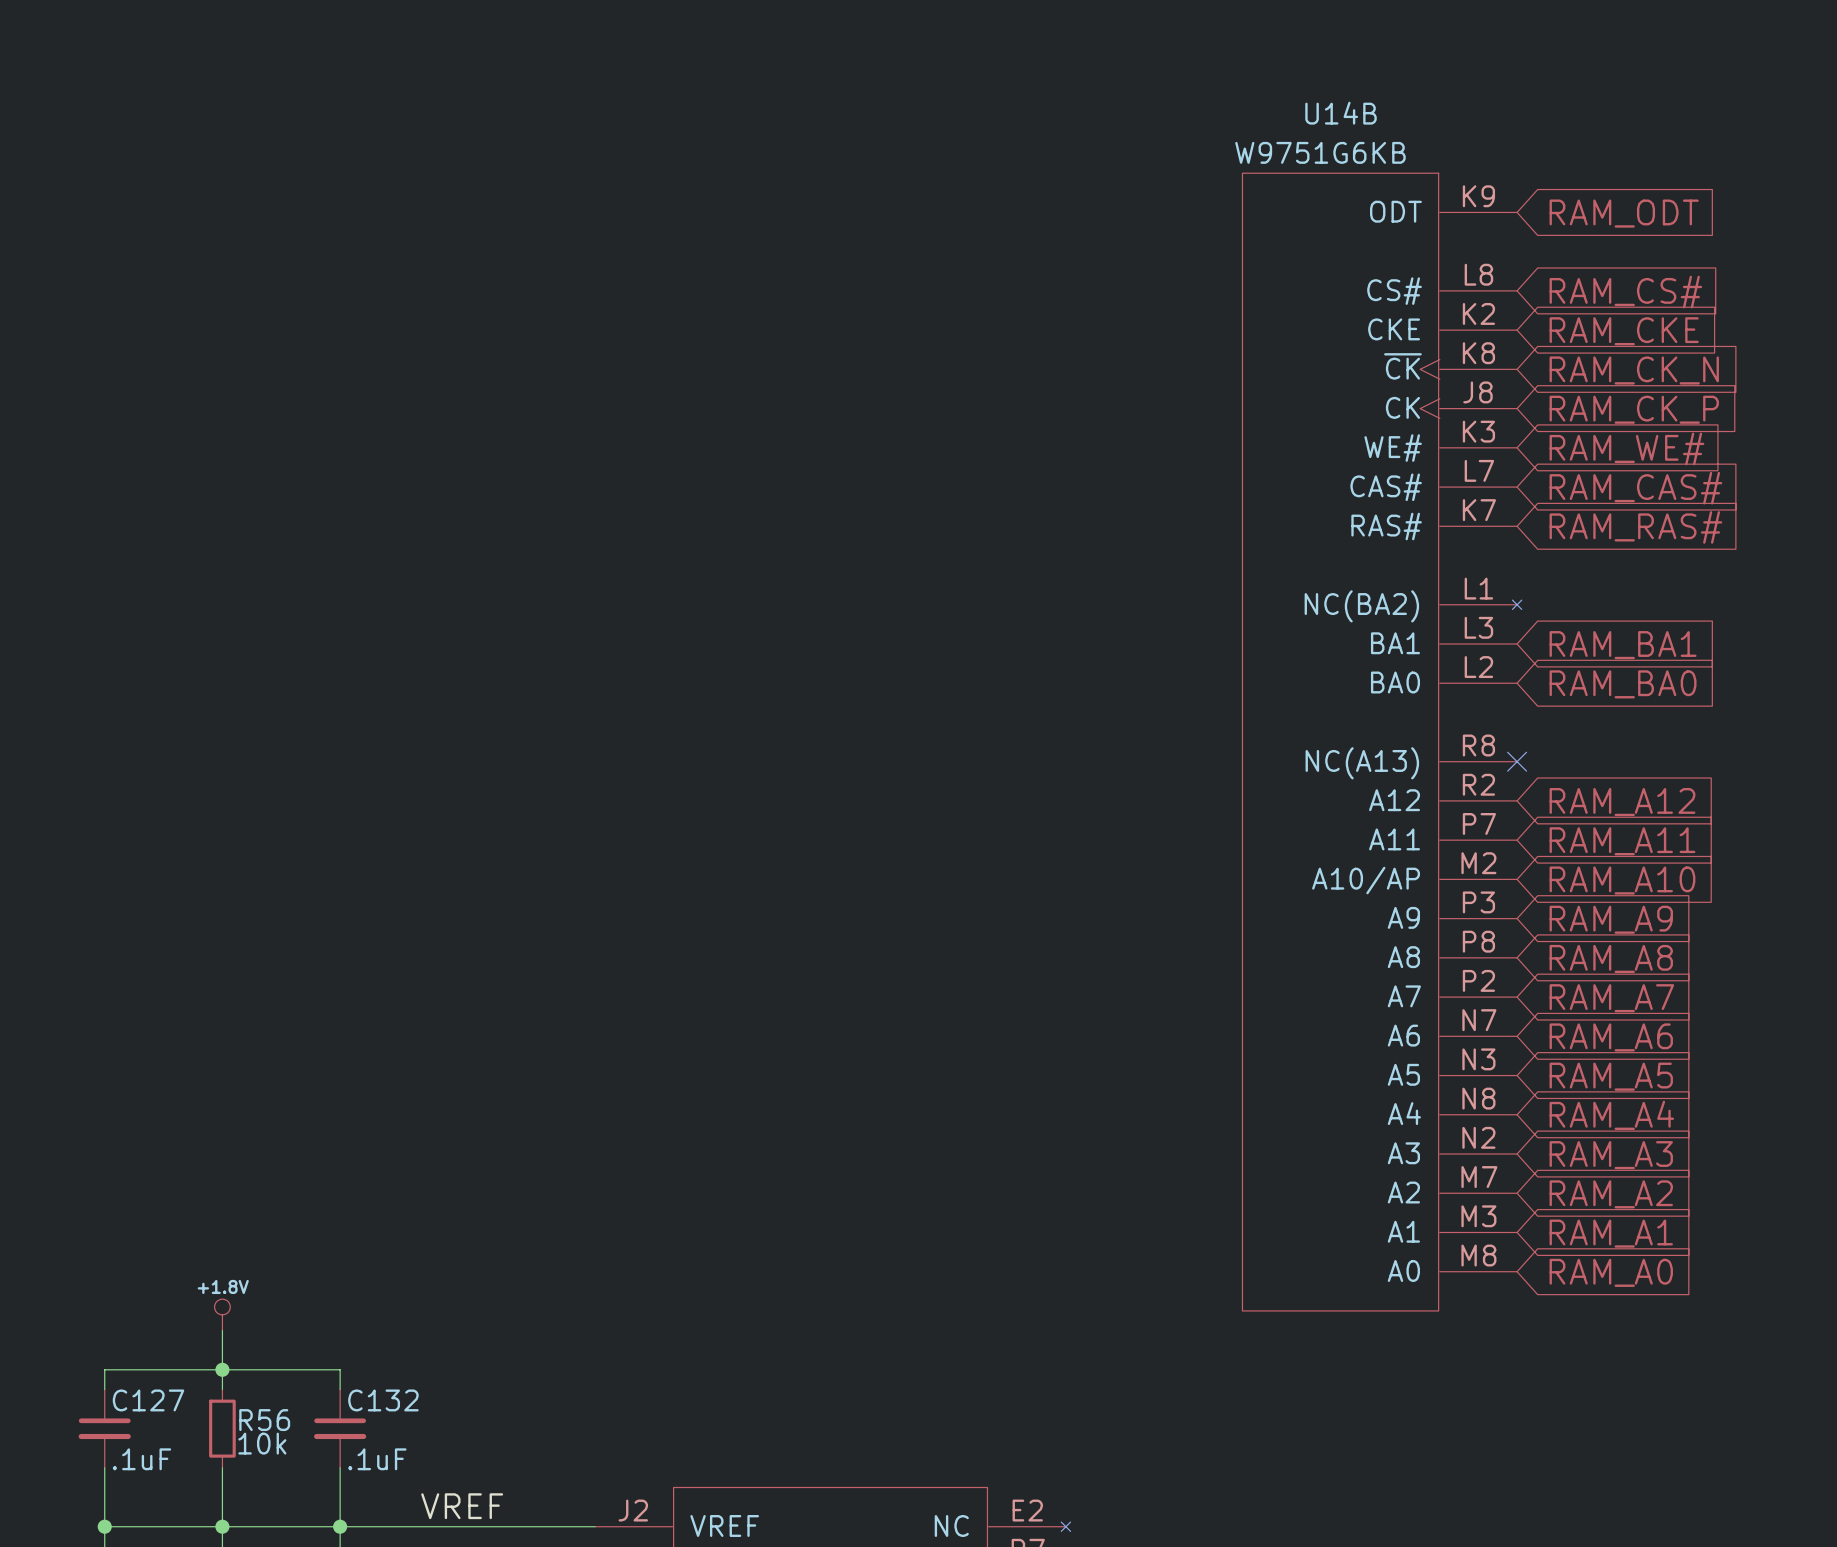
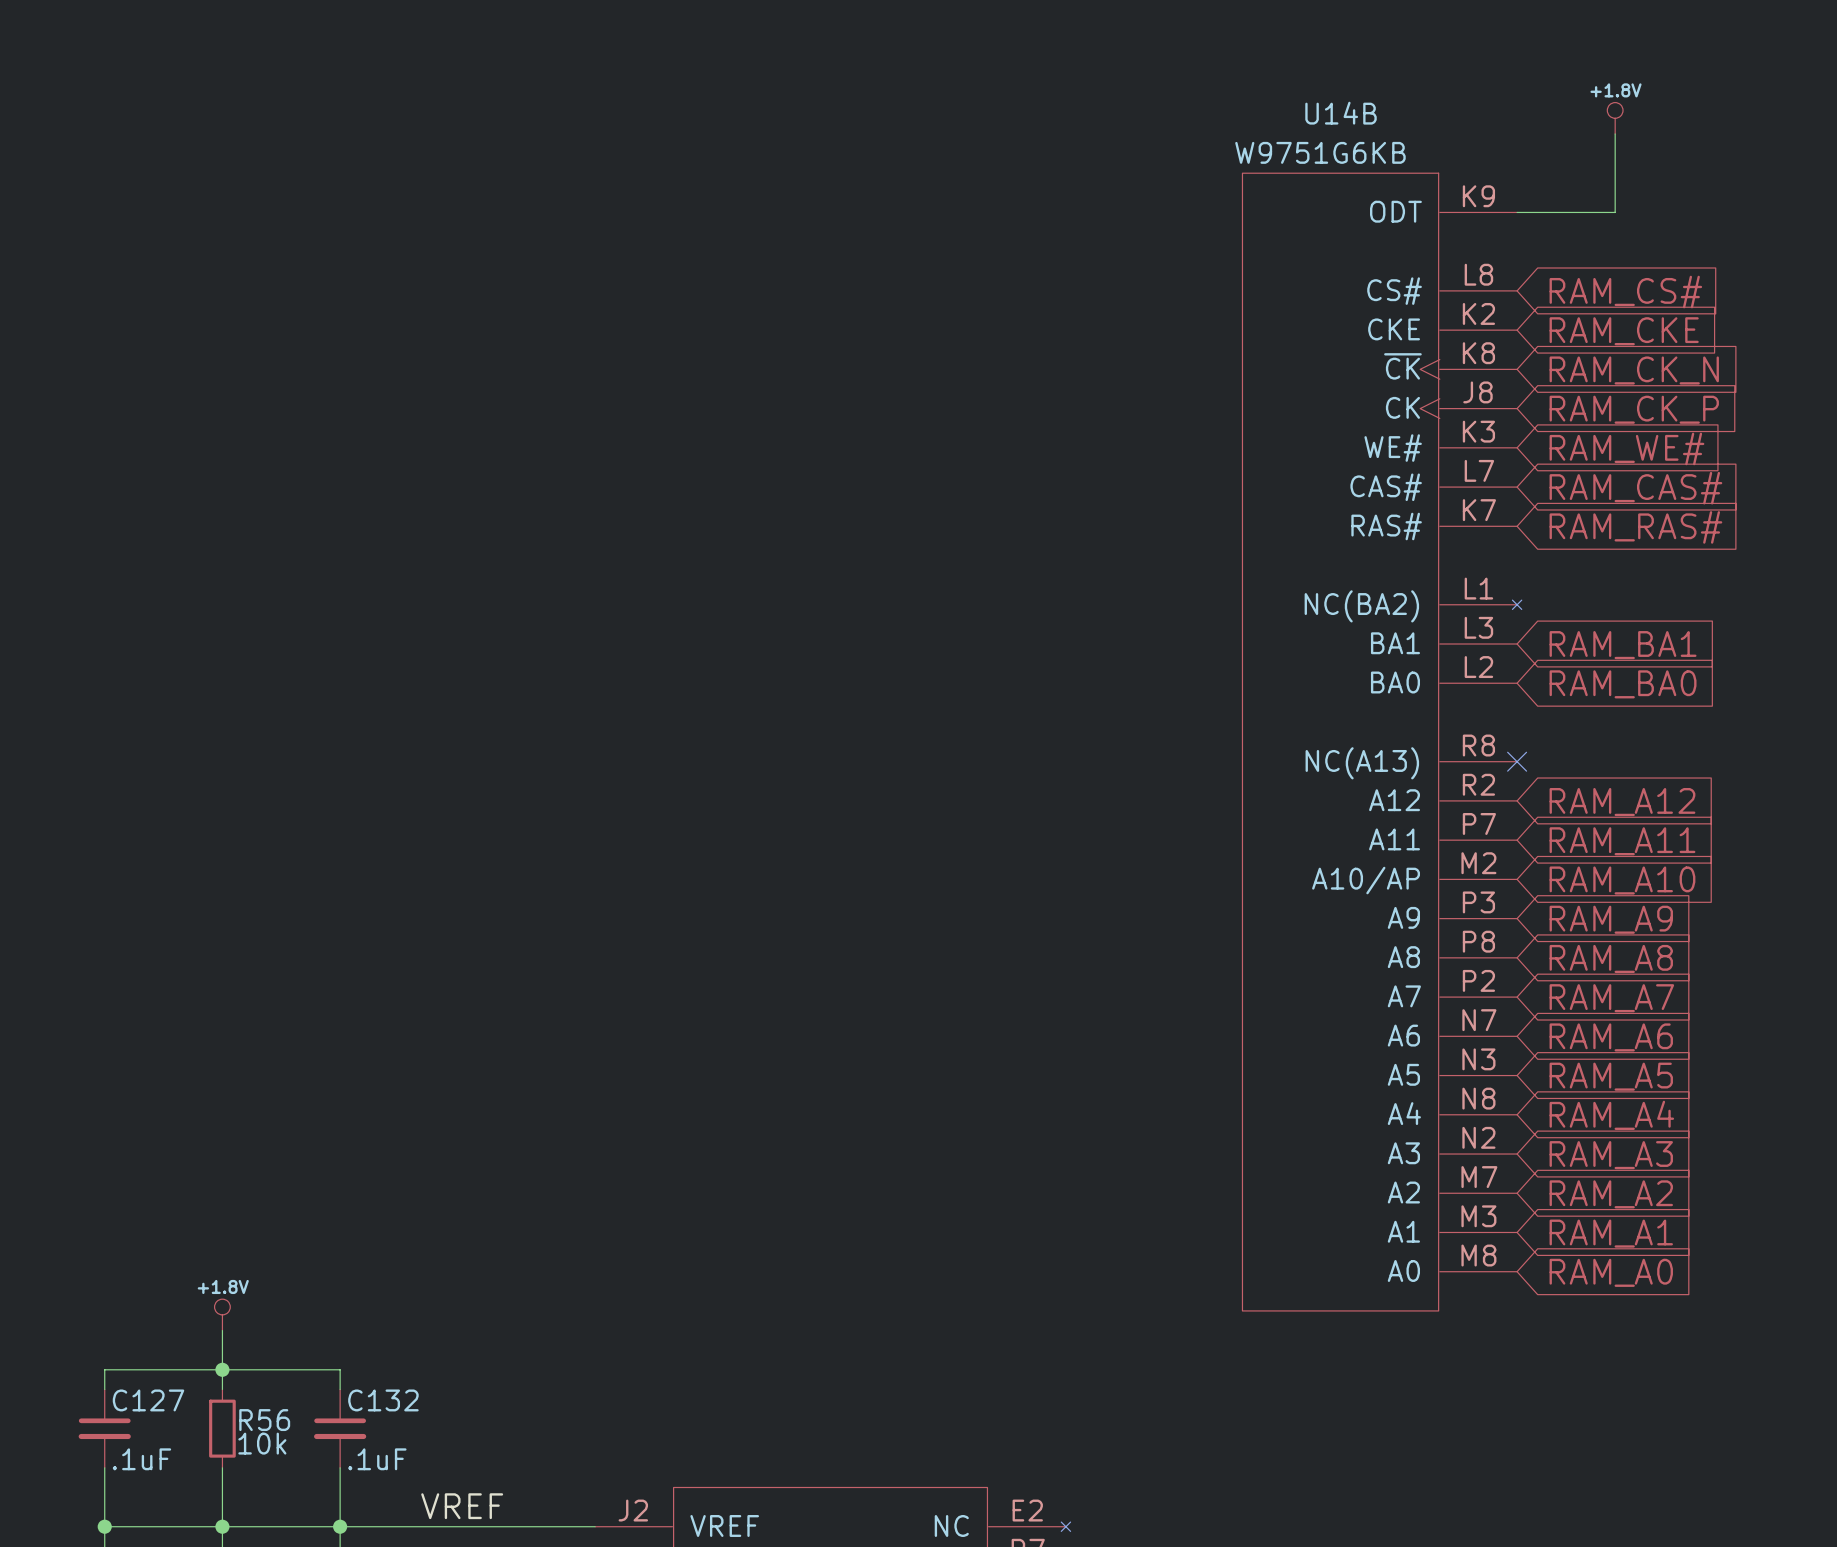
power symbol: none -> +1.8V (1615, 118)
wire: none -> (1615, 133) (1615, 212) (1517, 212)
global label: RAM_ODT (1624, 213) -> none

